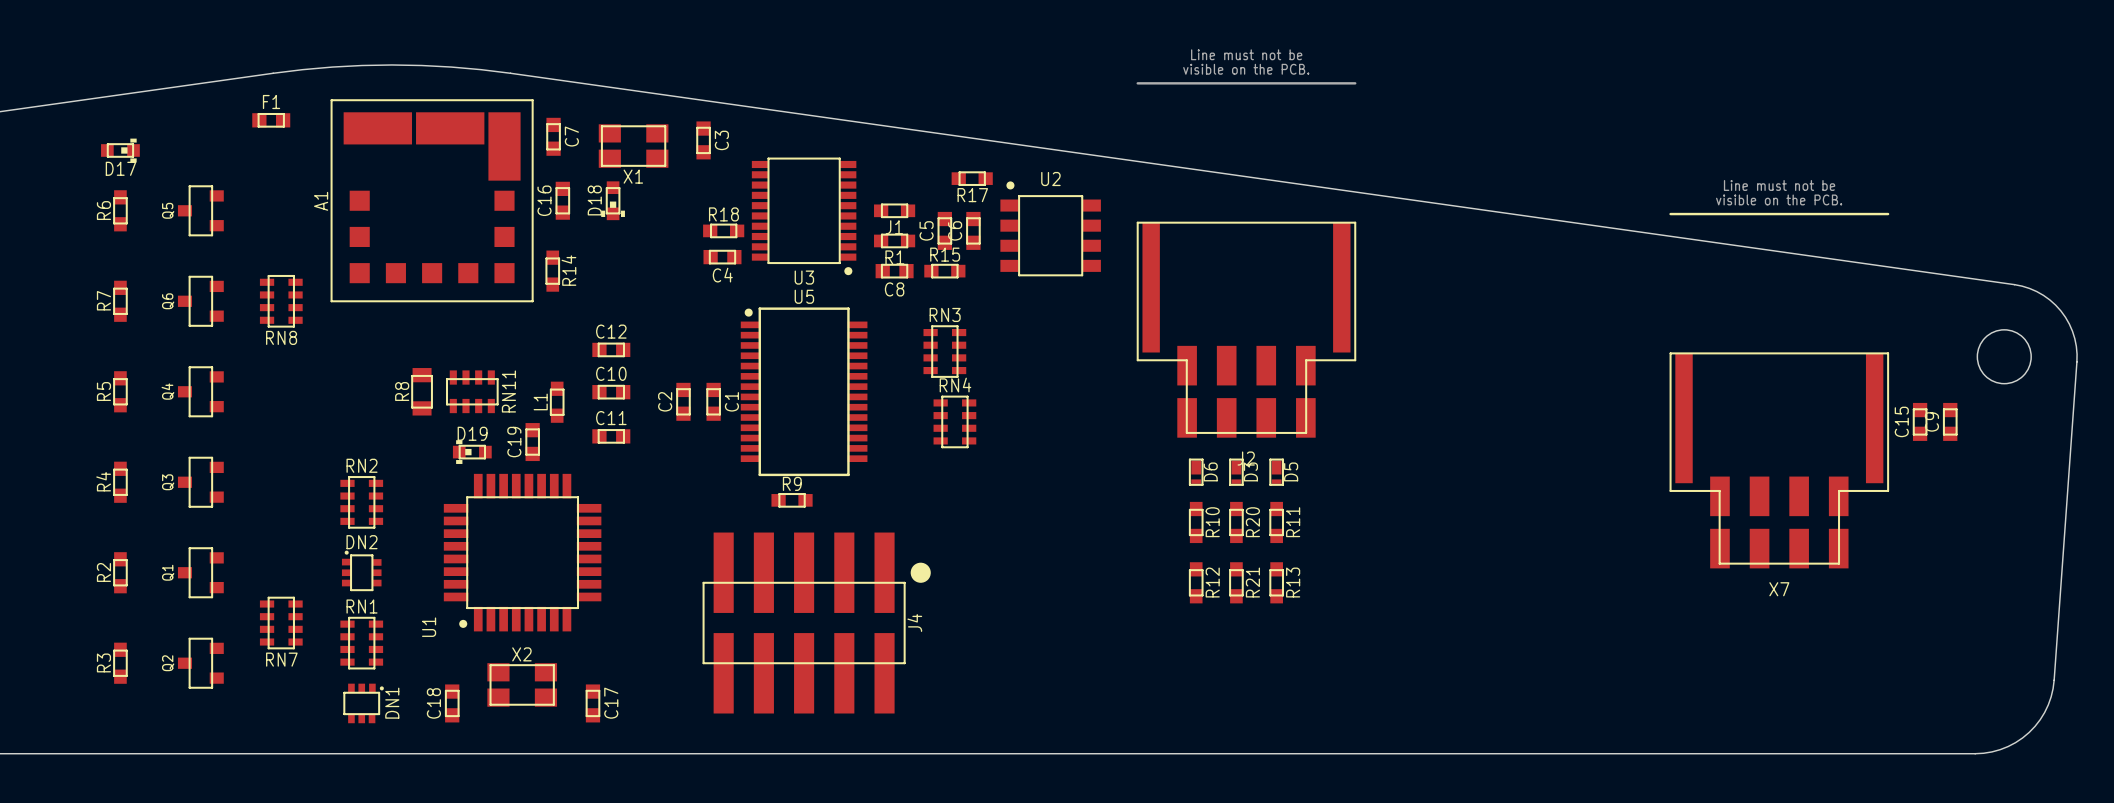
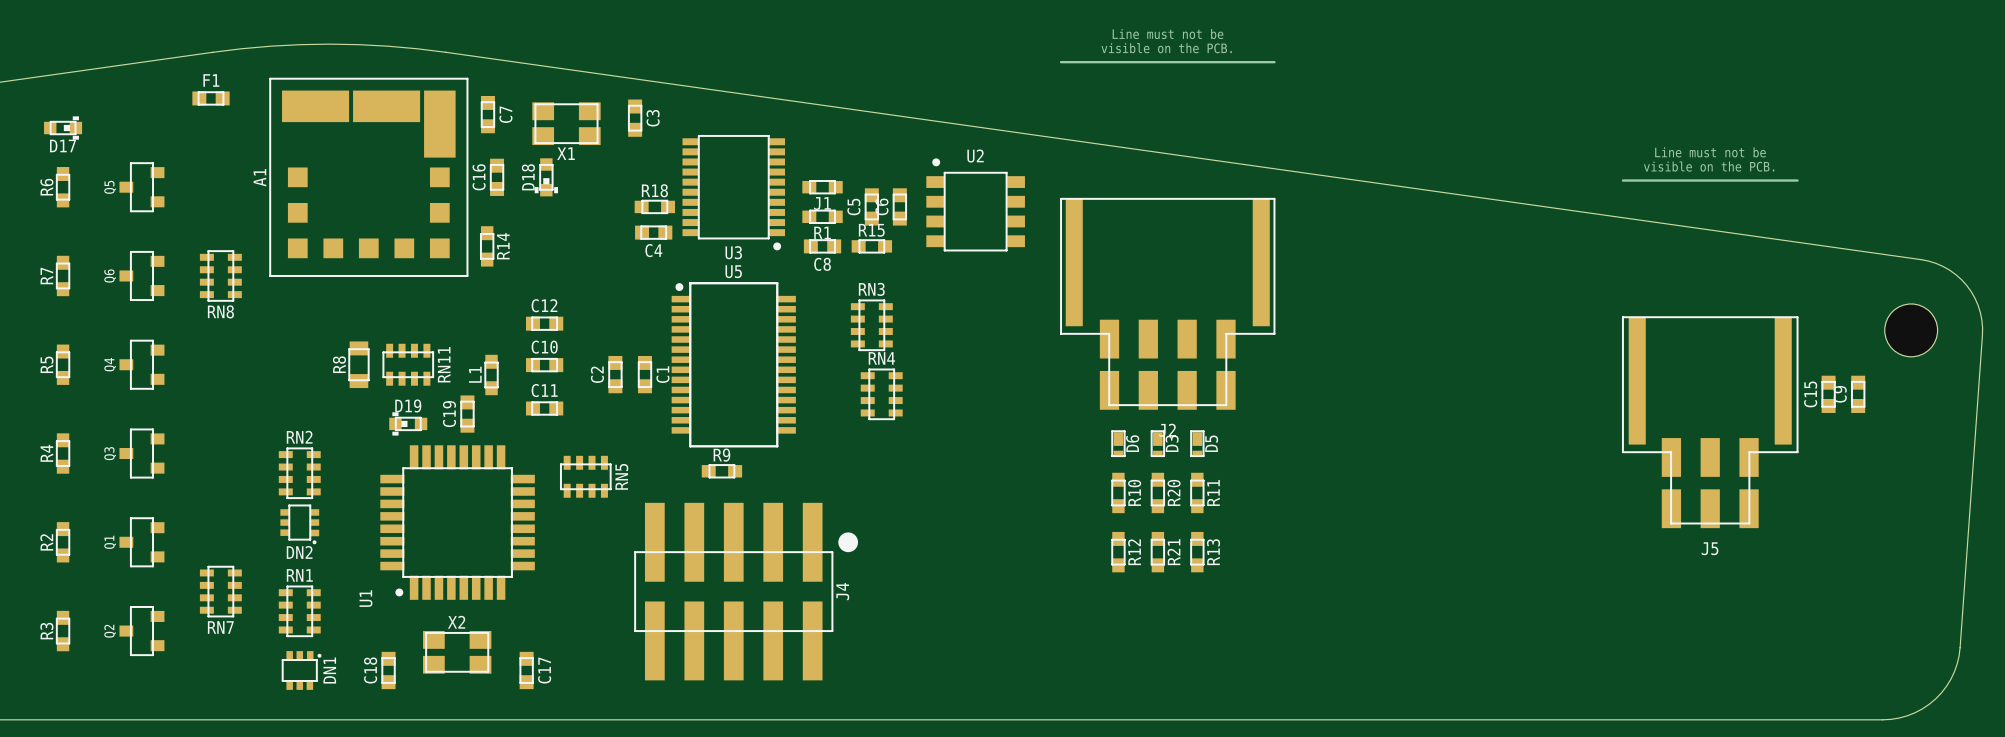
R17: (972, 178) -> none
J5: none -> (1710, 353)
X7: (1779, 390) -> none
RN5: none -> (585, 476)
DN2 rotation: 0° (361, 570) -> 180° (299, 524)

